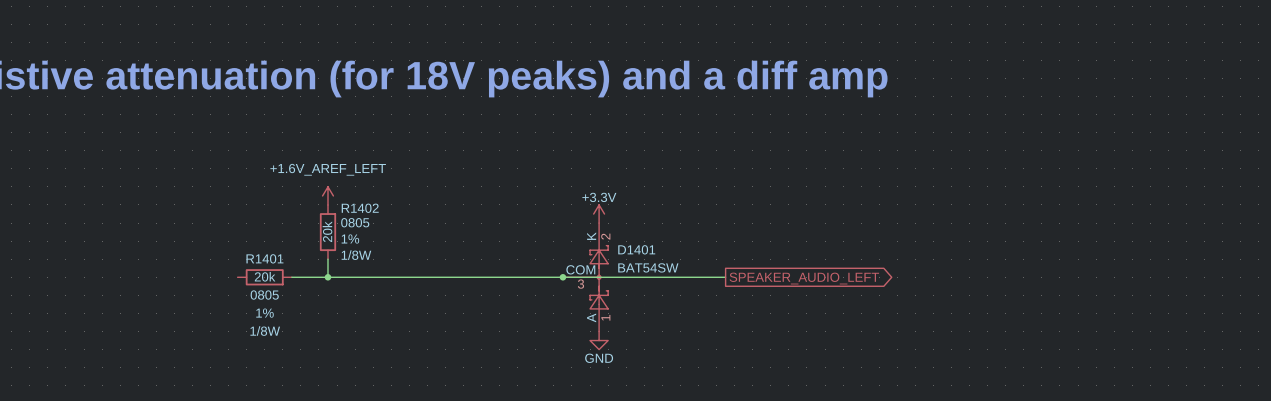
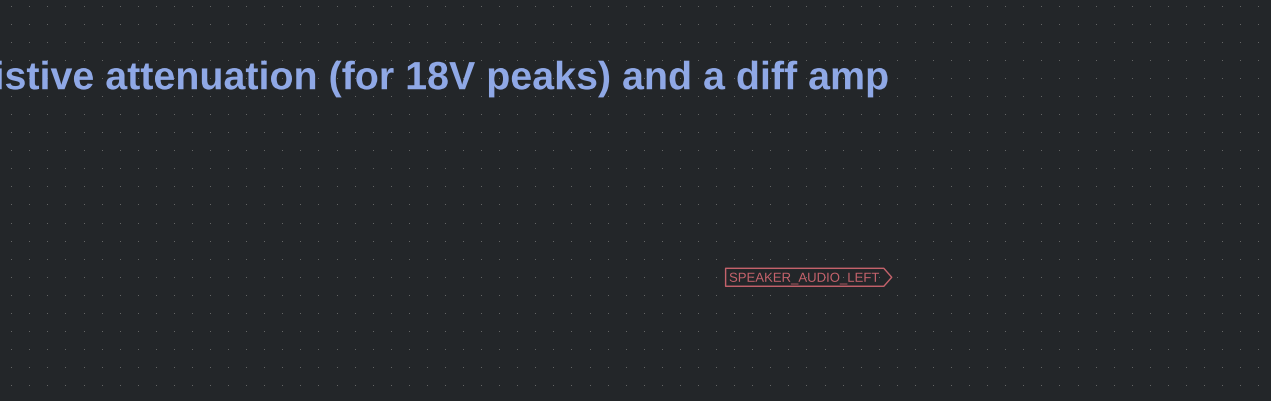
power symbol: +1.6V_AREF_LEFT (327, 195) -> none
power symbol: +3.3V (599, 214) -> none
R1402: 20k (327, 232) -> none
wire: (327, 259) (327, 277) -> none
R1401: 20k (264, 277) -> none
wire: (291, 277) (725, 277) -> none
junction: (327, 277) -> none
junction: (562, 277) -> none
D1401: BAT54SW (585, 277) -> none
power symbol: GND (599, 340) -> none

